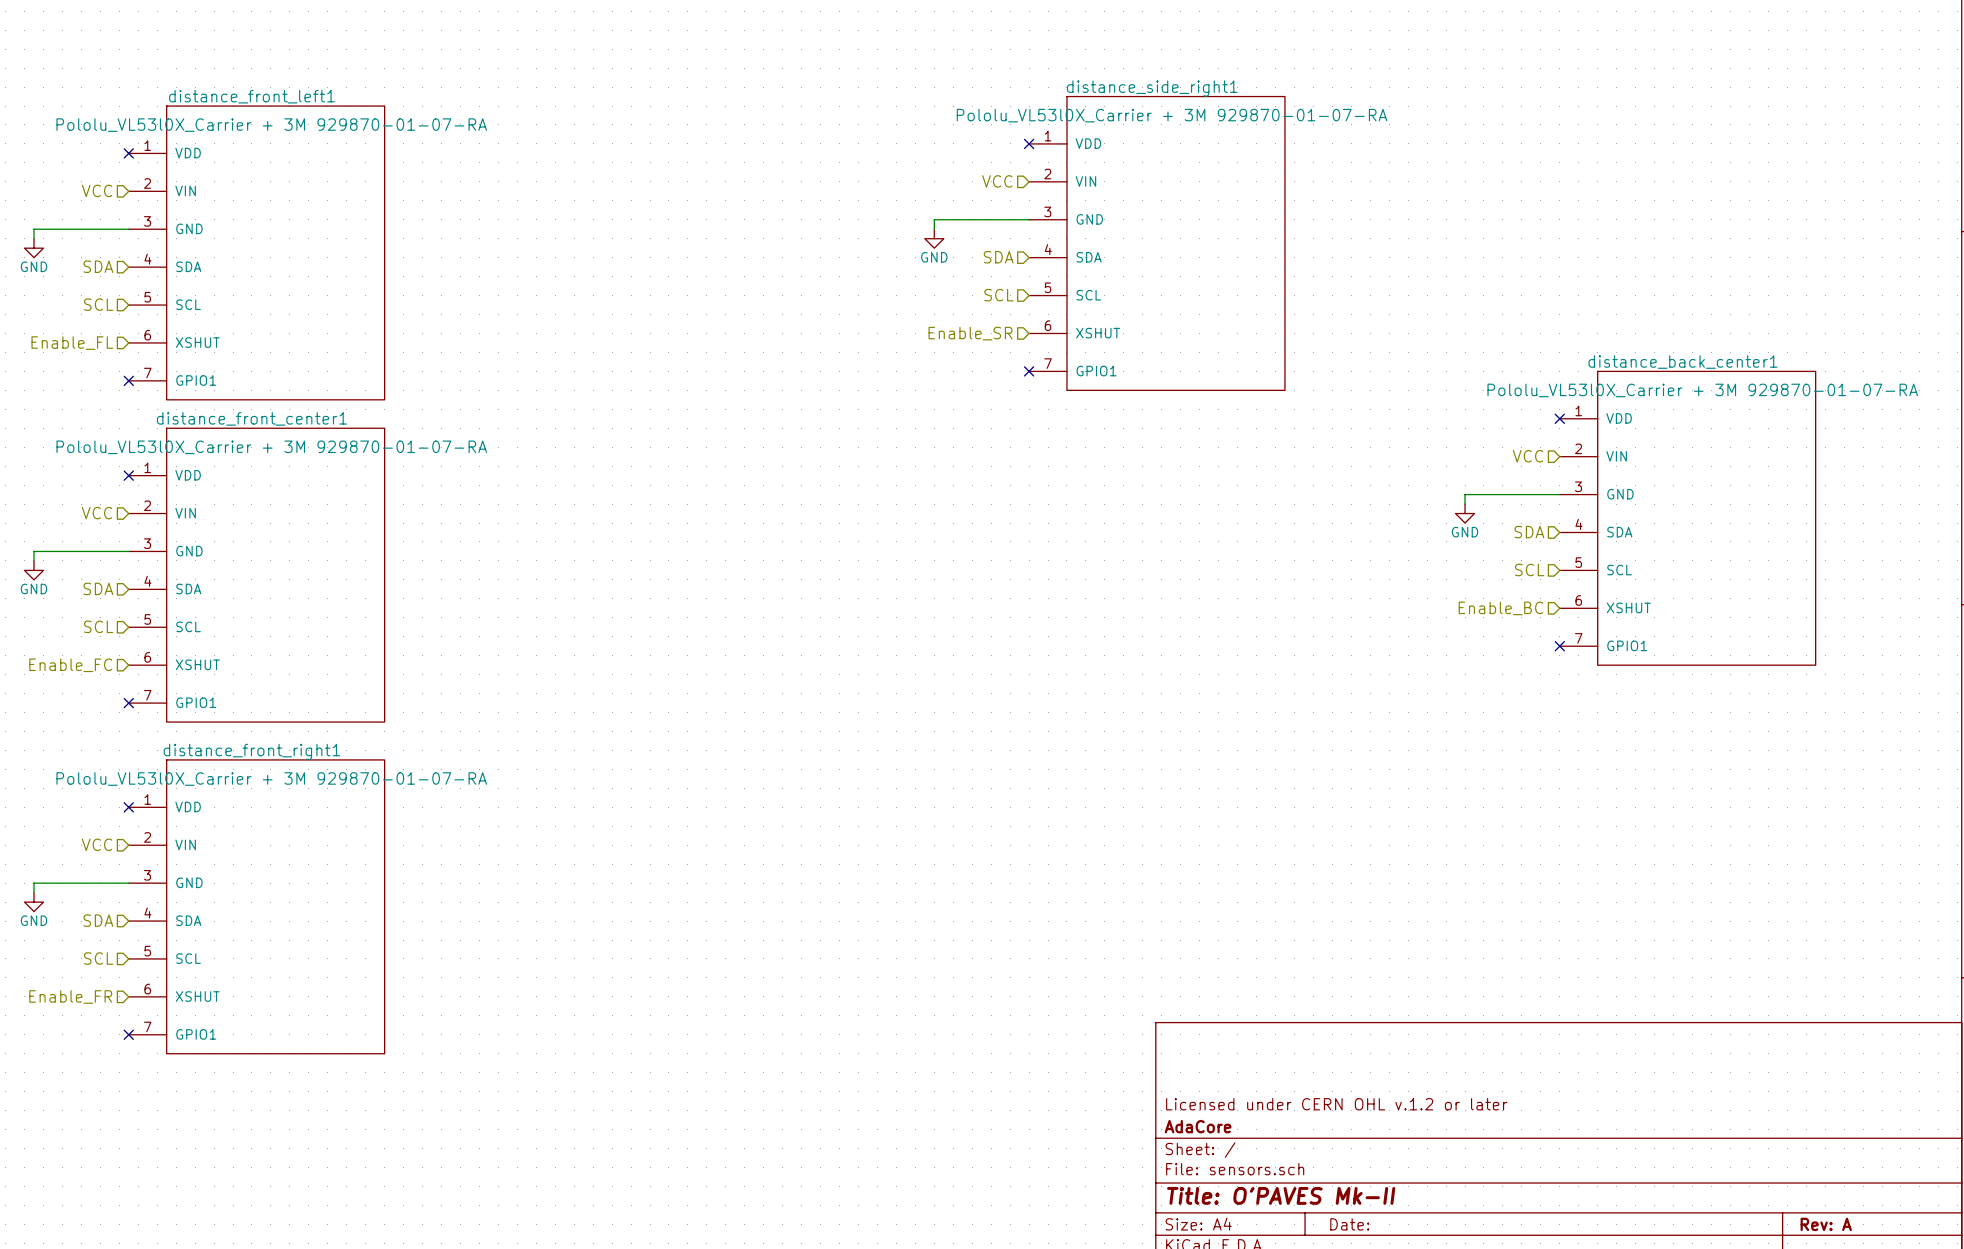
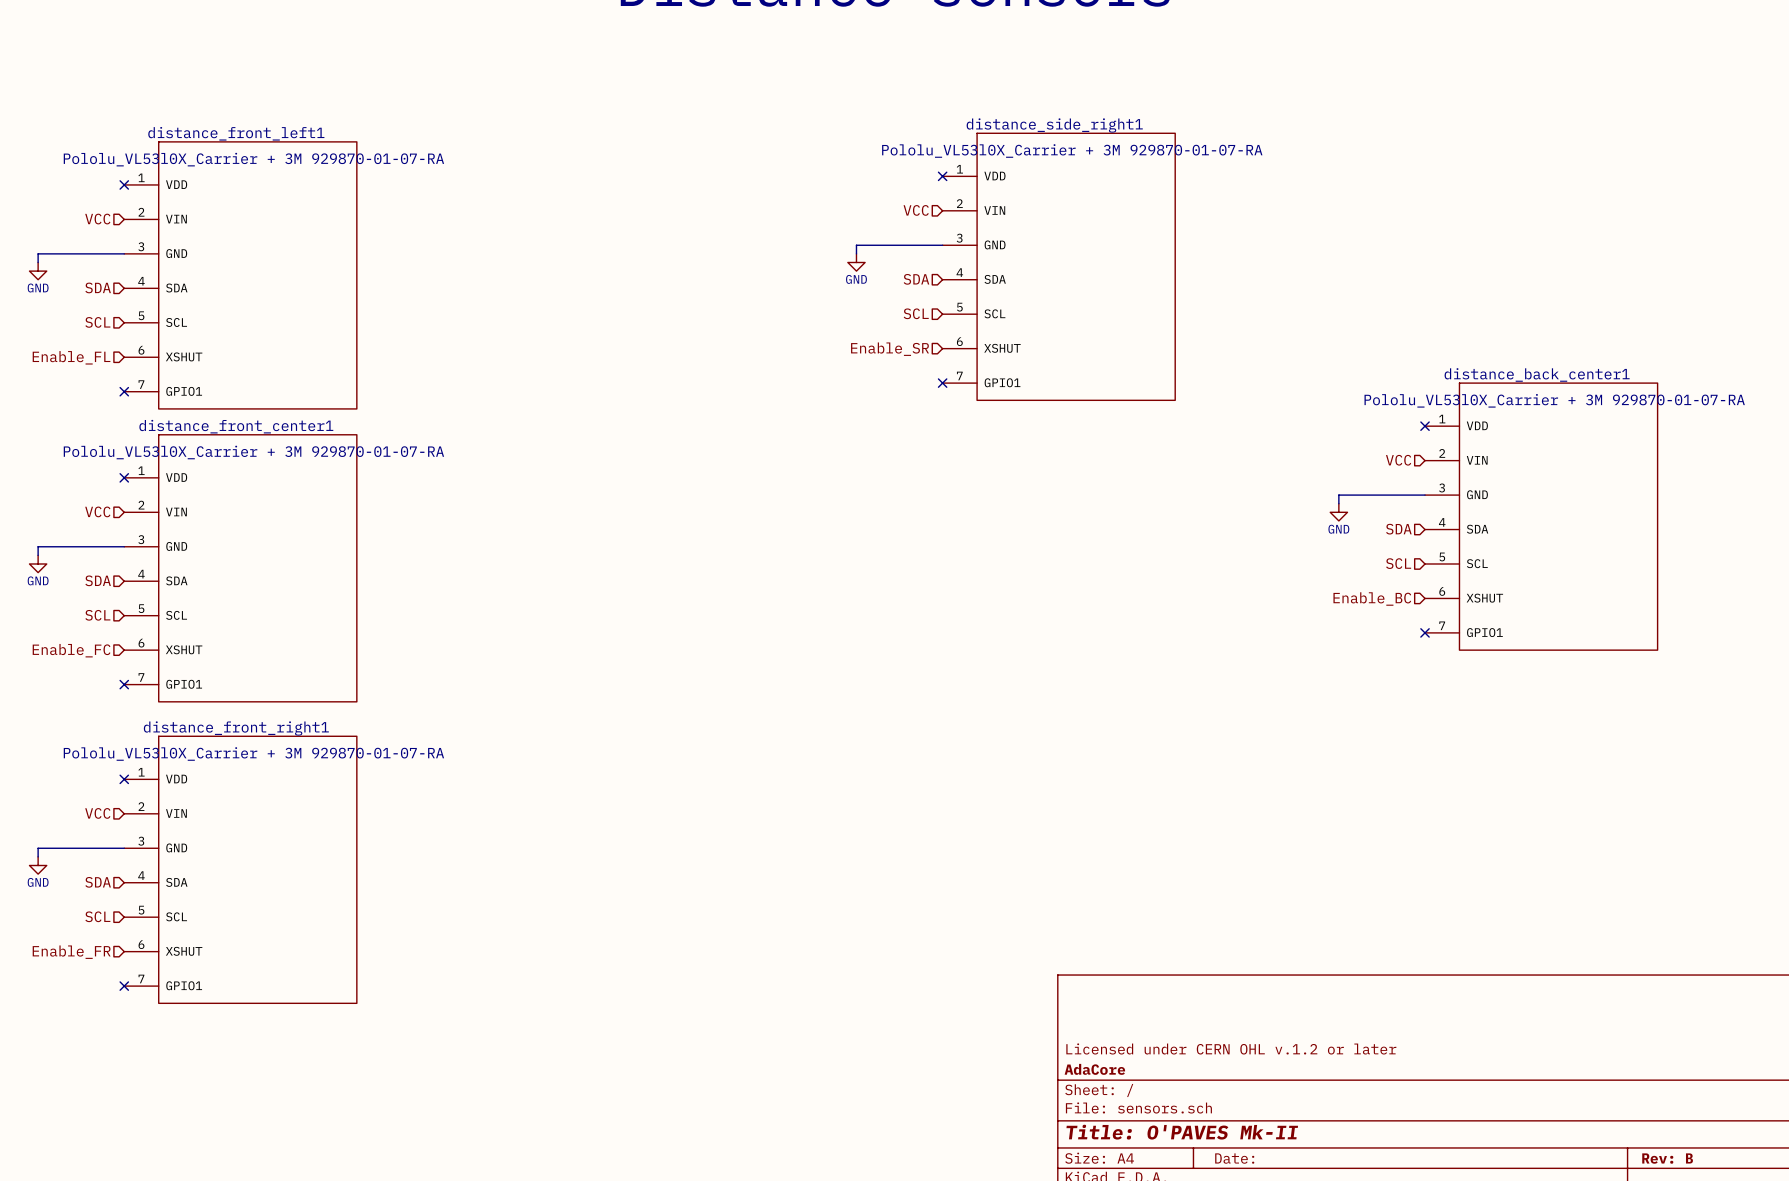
title block: Rev: A (1826, 1224) -> Rev: B (1667, 1158)

